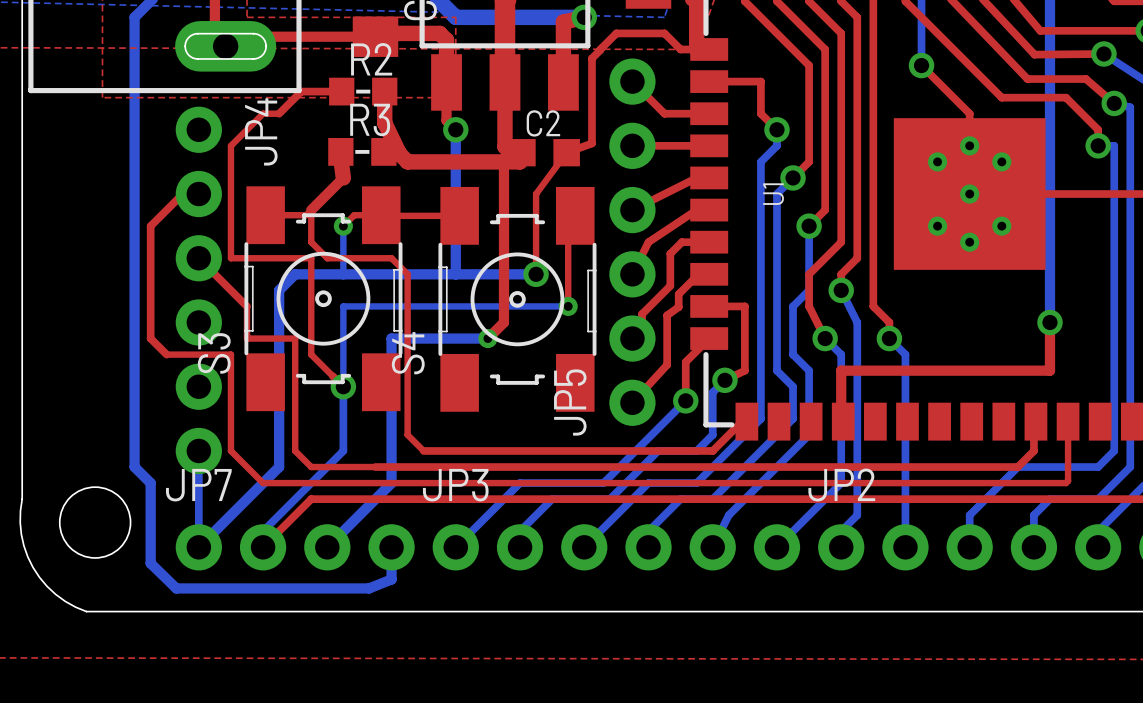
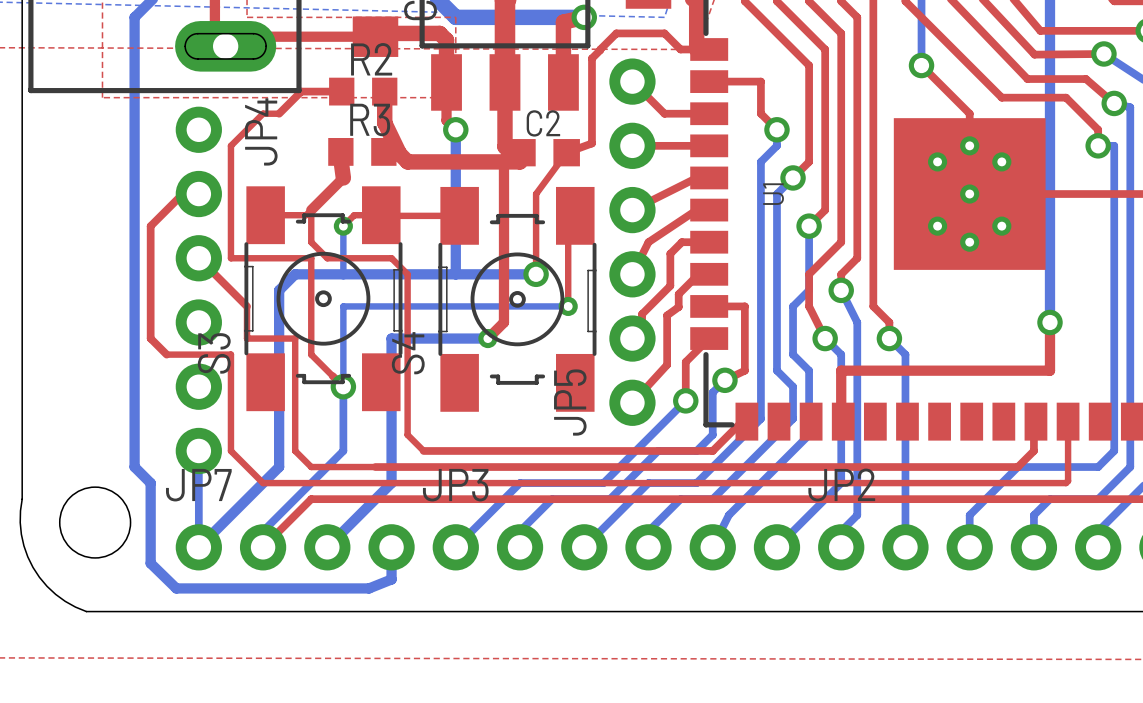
R2 footprint: [329, 77, 398, 106] -> [329, 77, 398, 106]
R3 footprint: [328, 138, 397, 166] -> [328, 138, 397, 166]

